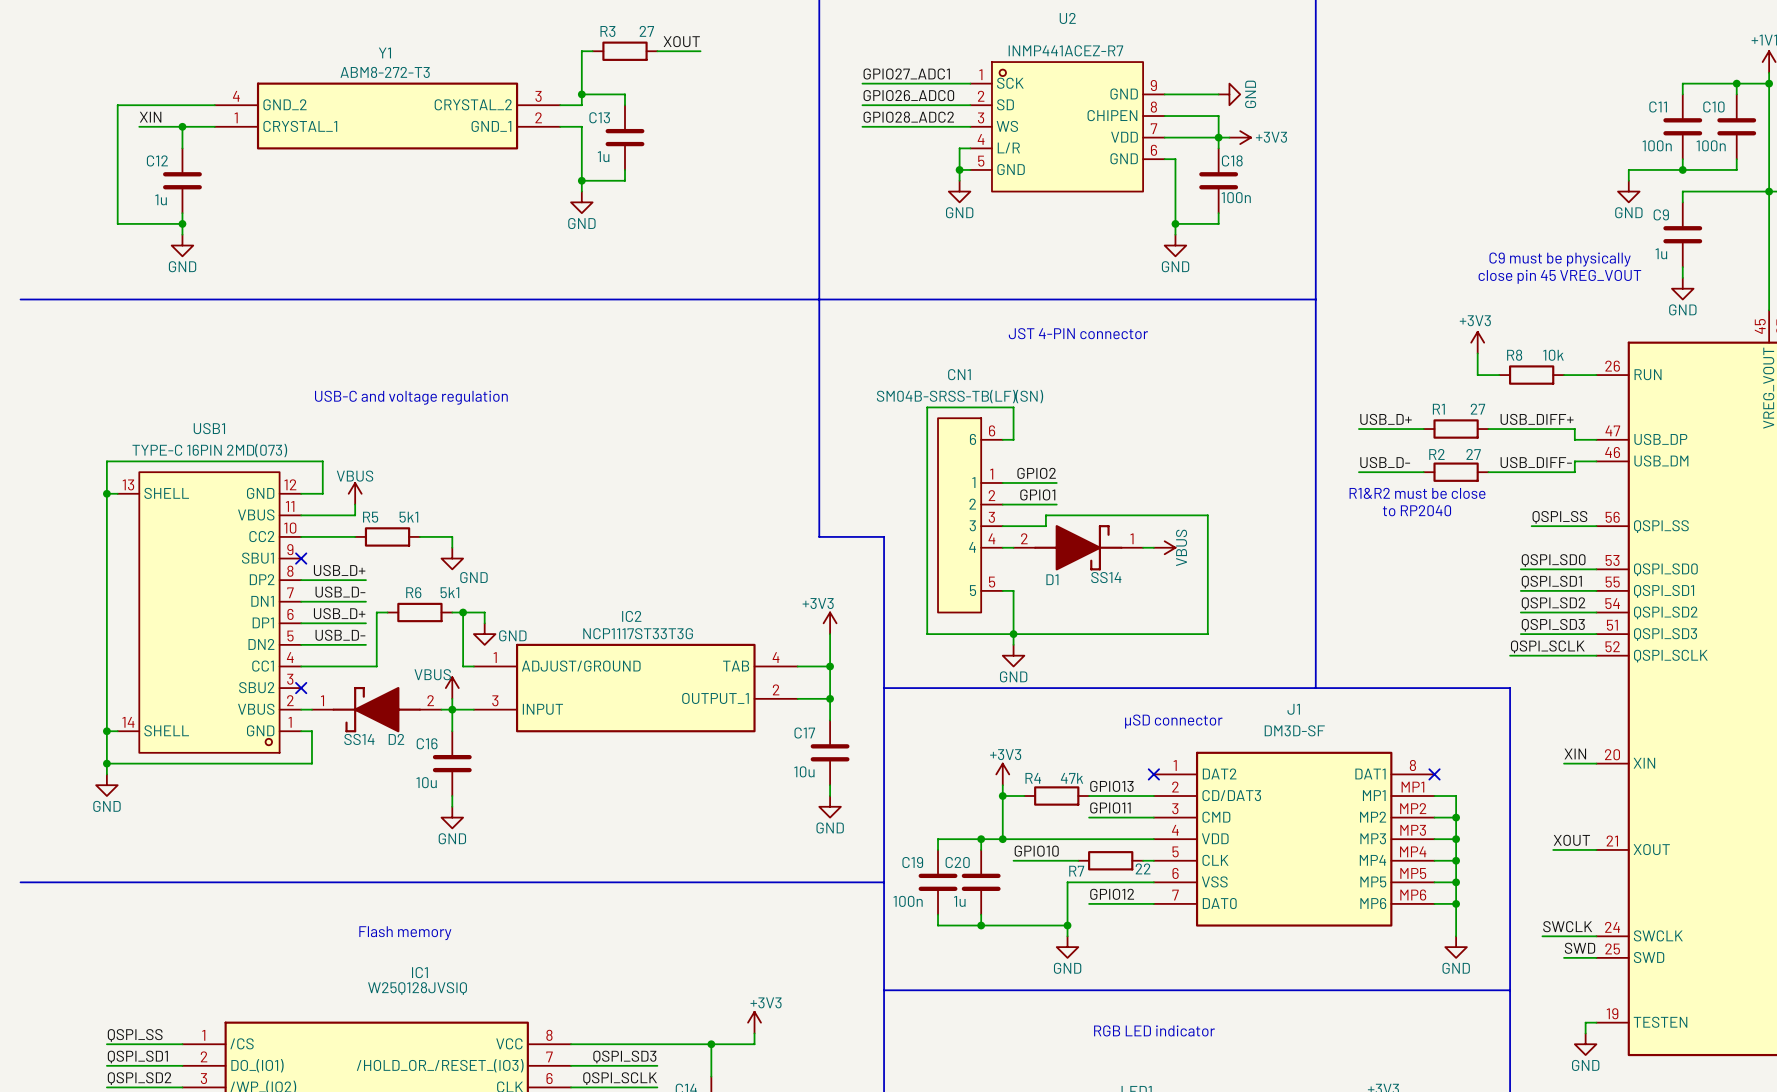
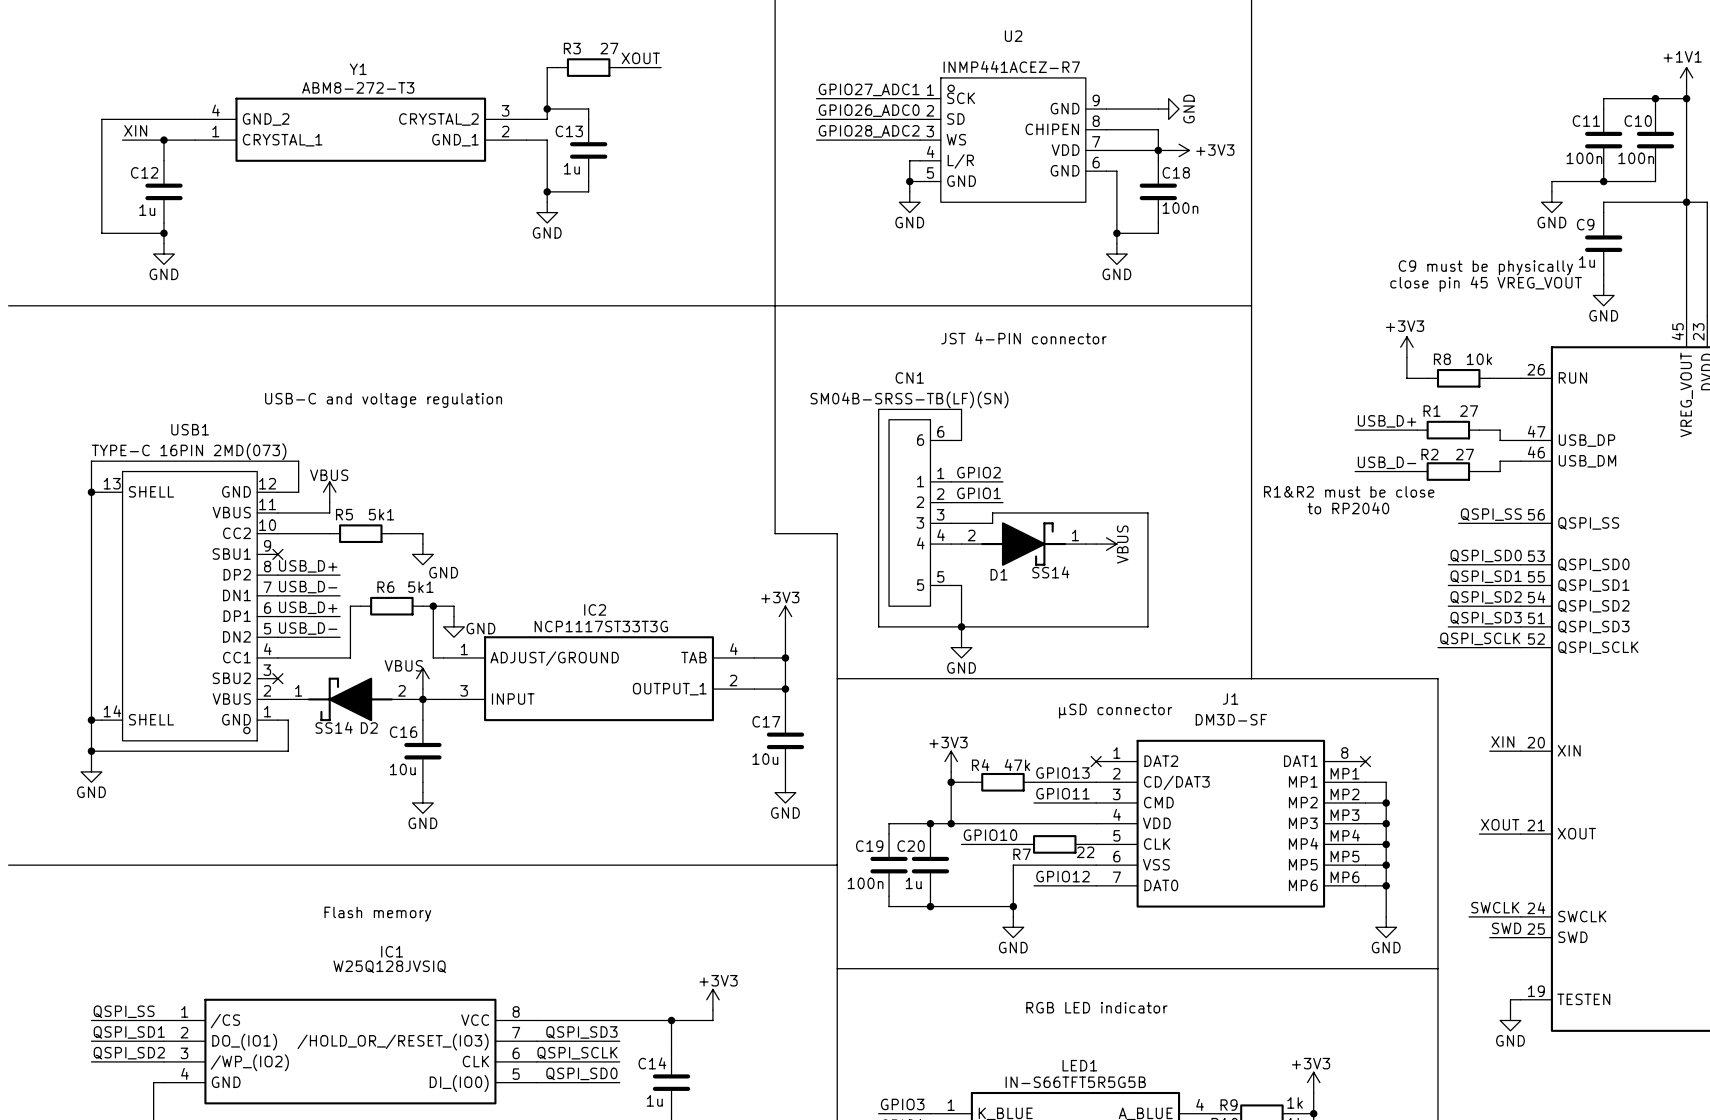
label position: USB_D+ (1386, 419) -> USB_D+ (1387, 421)
label: USB_DIFF+ (1537, 419) -> none
wire: (1358, 429) (1423, 429) -> (1417, 430) (1355, 430)
R1 position: (1456, 429) -> (1448, 430)
wire: (1488, 429) (1553, 429) -> none
label position: USB_D- (1385, 462) -> USB_D- (1387, 462)
label: USB_DIFF- (1536, 462) -> none
wire: (1358, 472) (1423, 472) -> (1417, 471) (1355, 471)
R2 position: (1456, 472) -> (1448, 471)
wire: (1488, 472) (1553, 472) -> none

